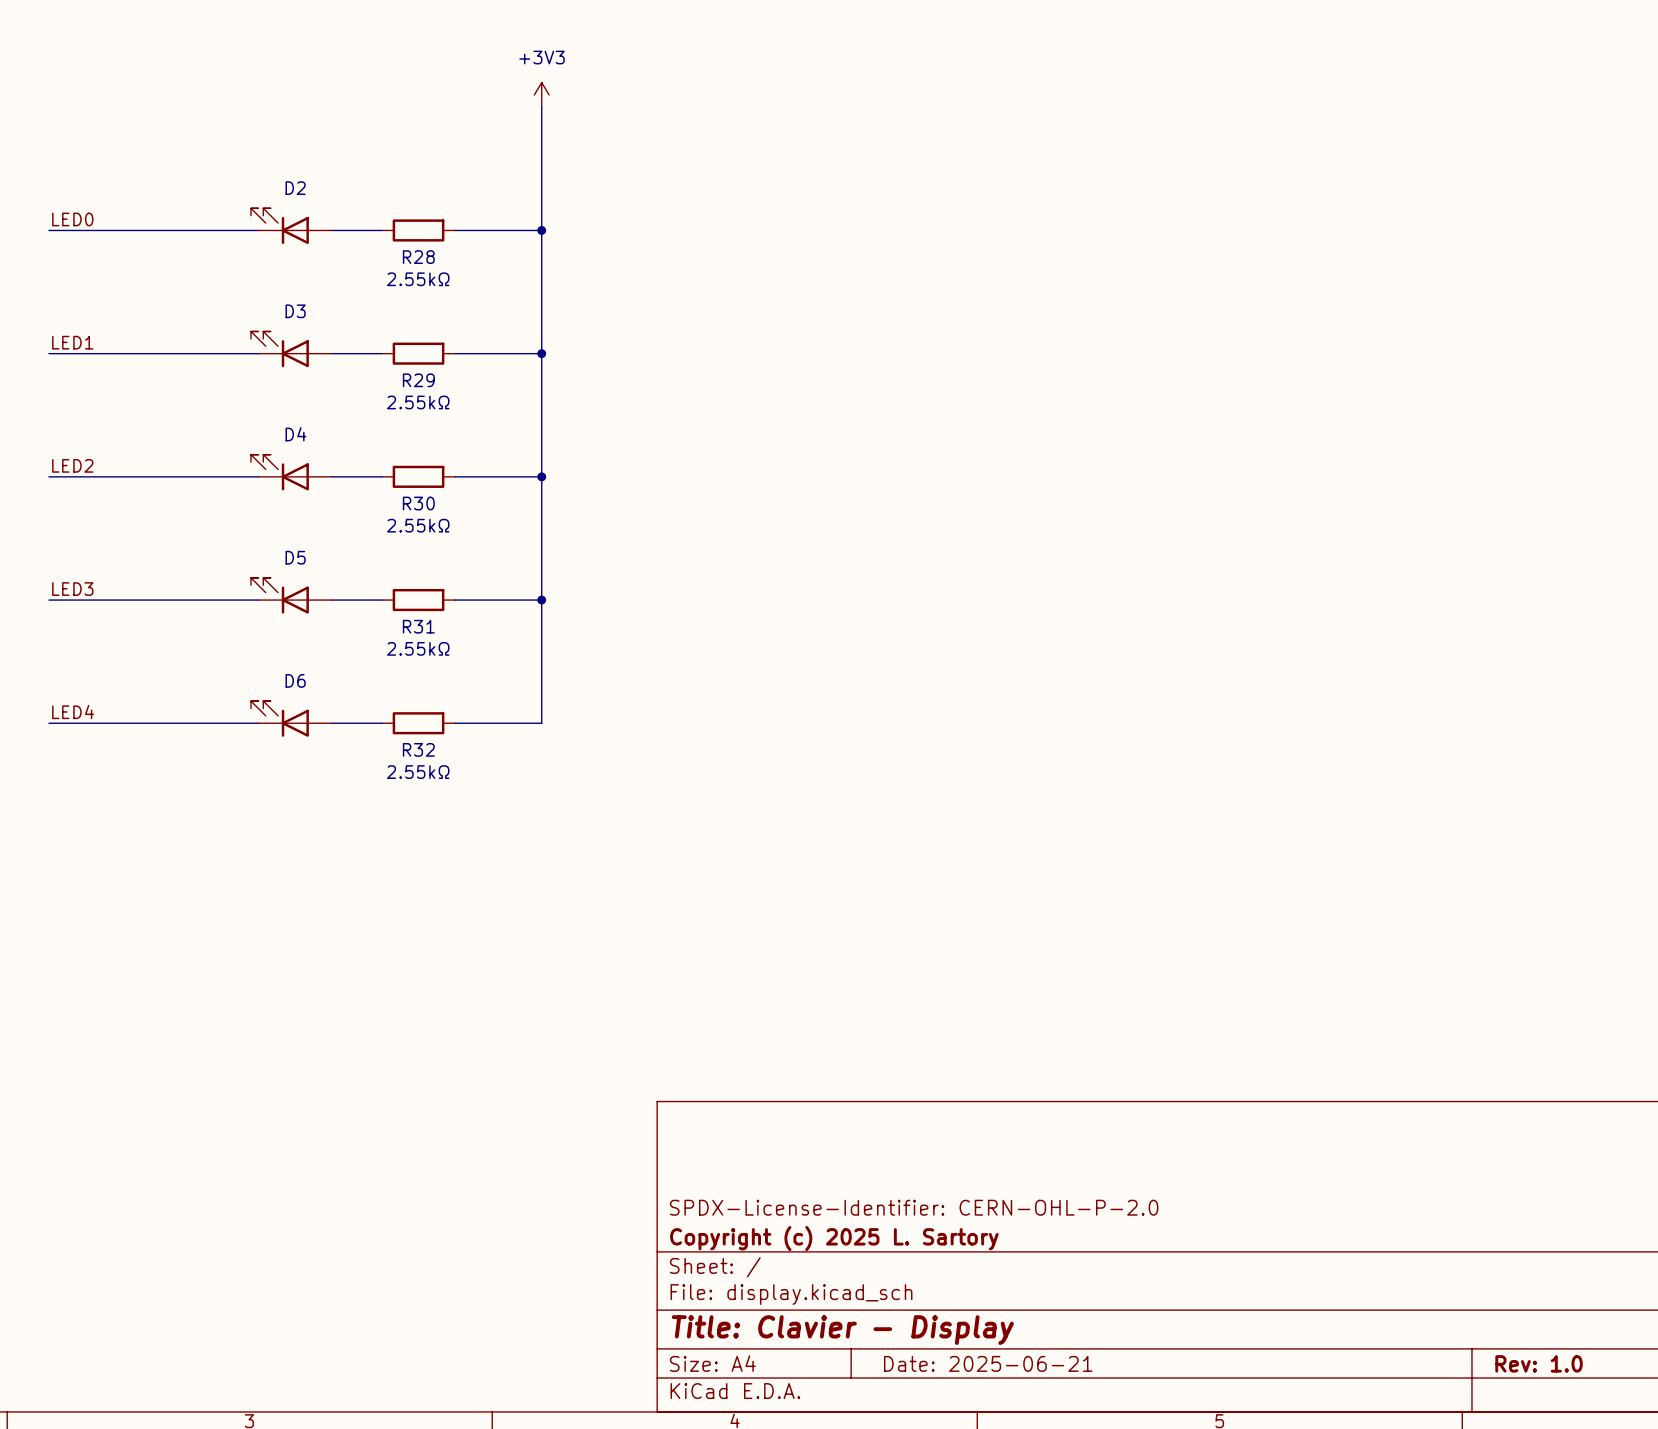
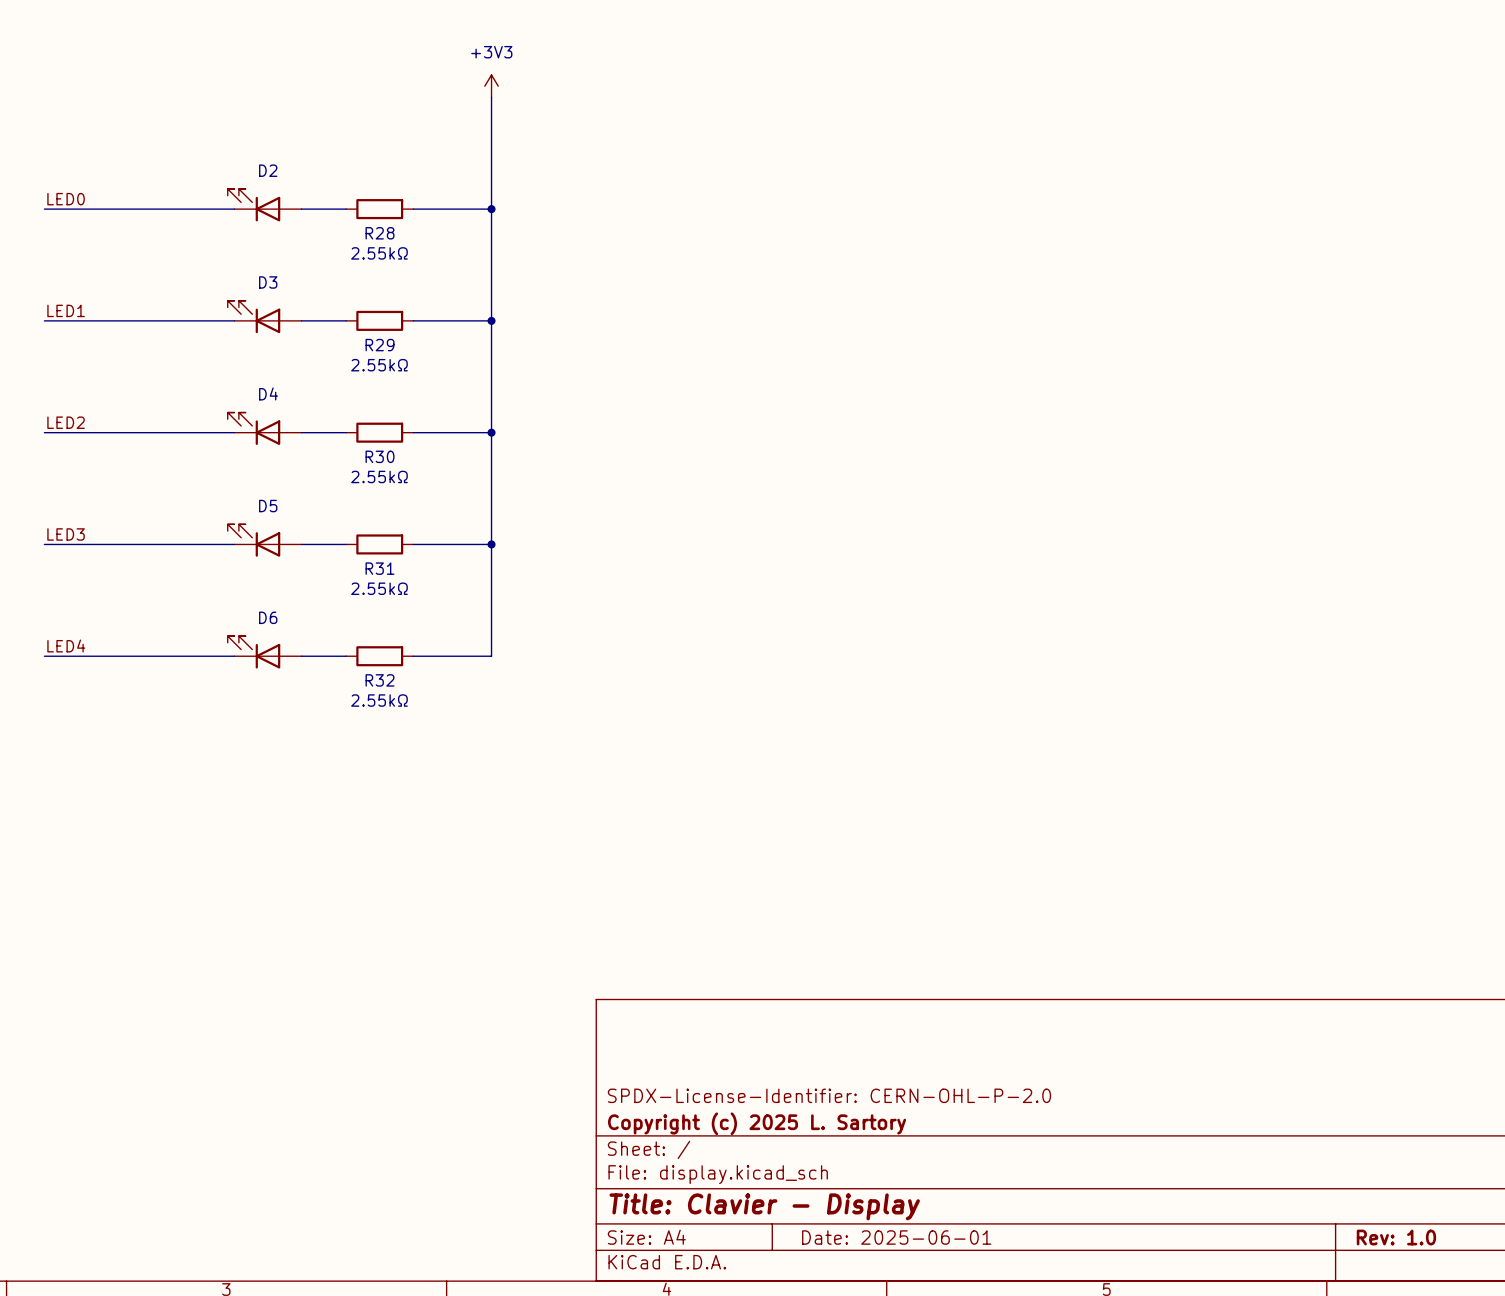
title block: Date: 2025-06-21 (988, 1363) -> Date: 2025-06-01 (896, 1237)

